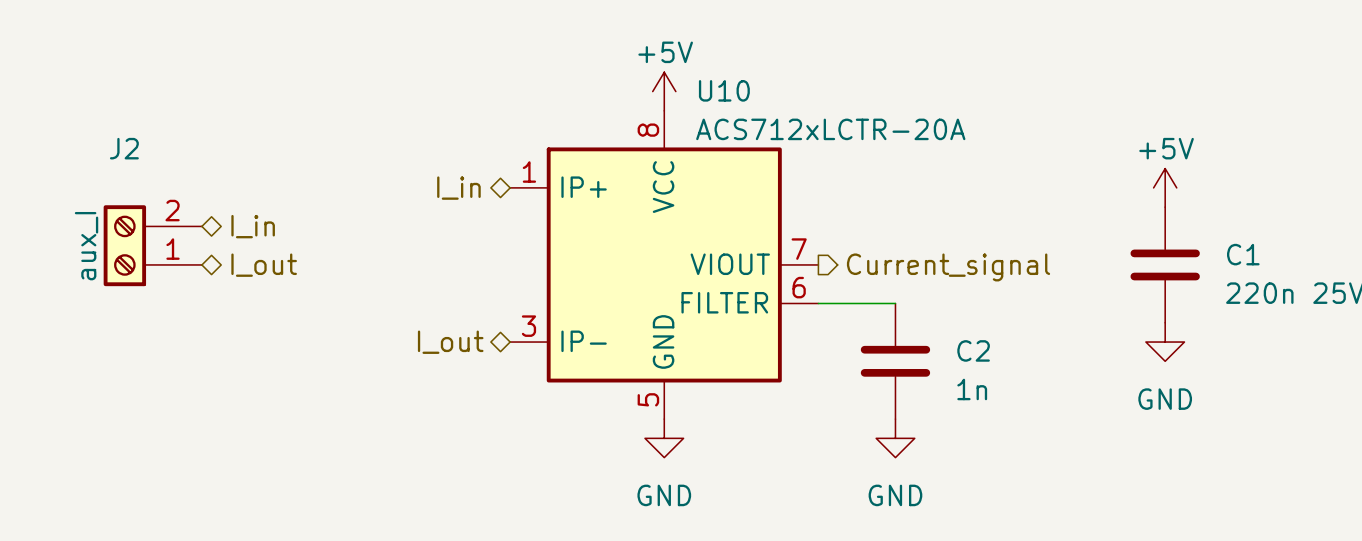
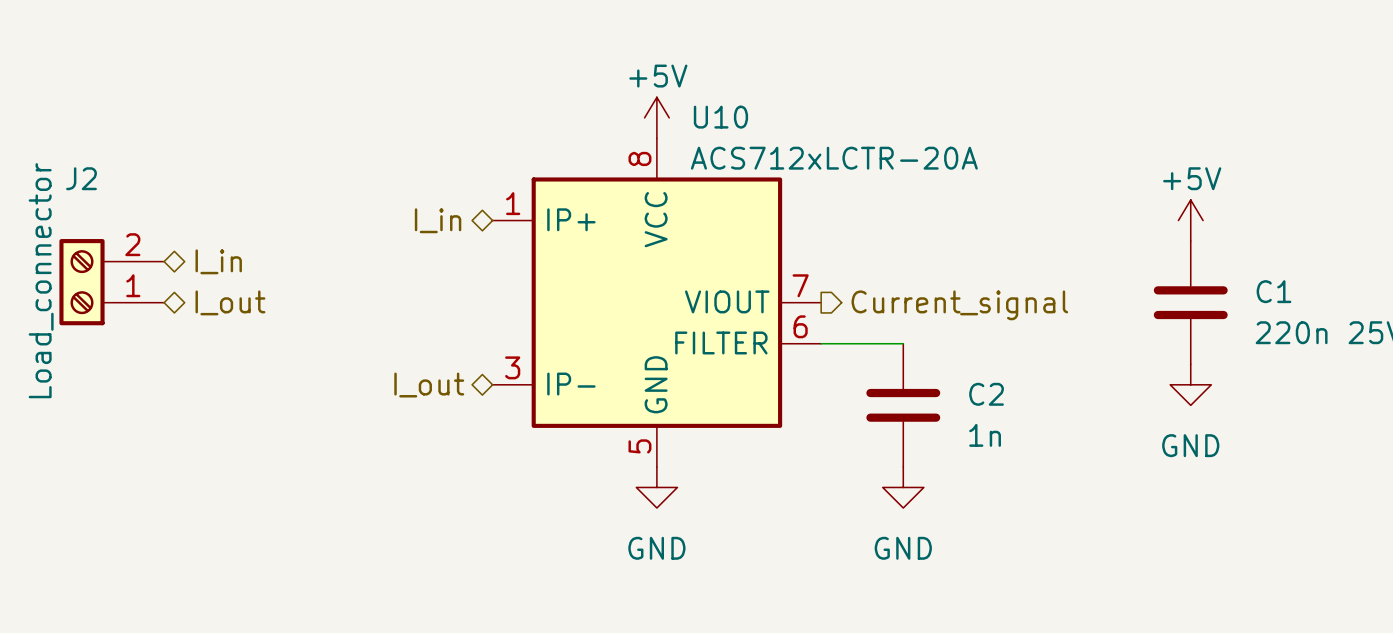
J2 value: aux_I (86, 246) -> Load_connector (41, 280)

